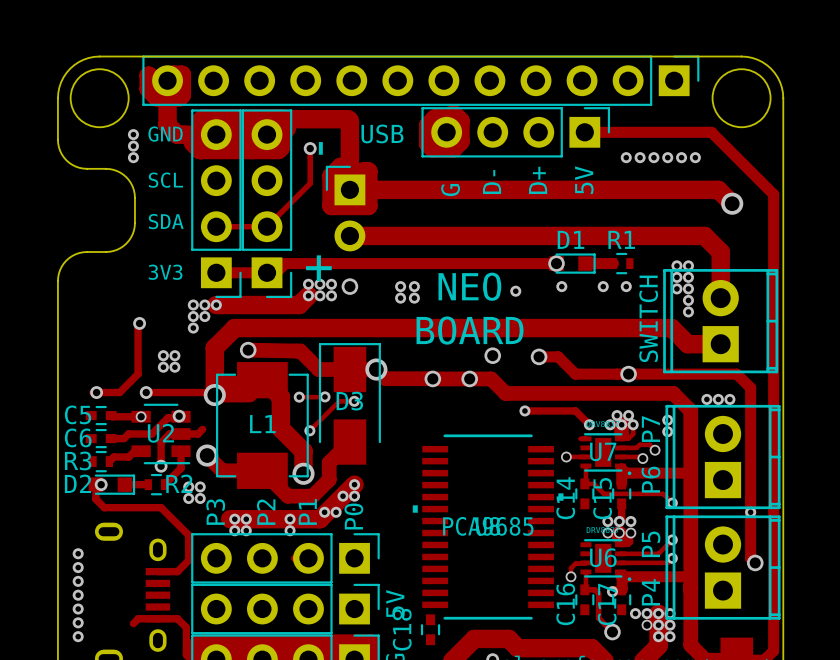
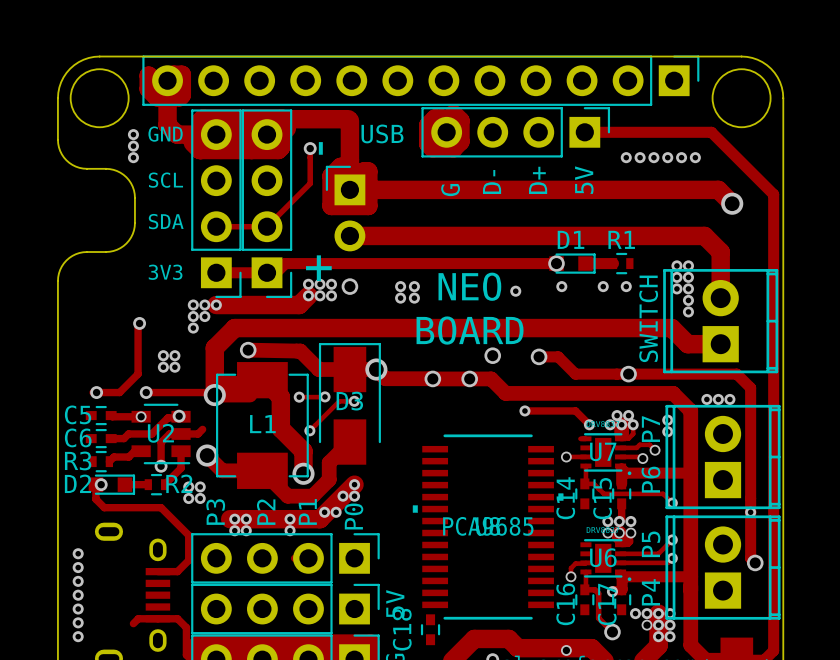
via: none -> (566, 650)

